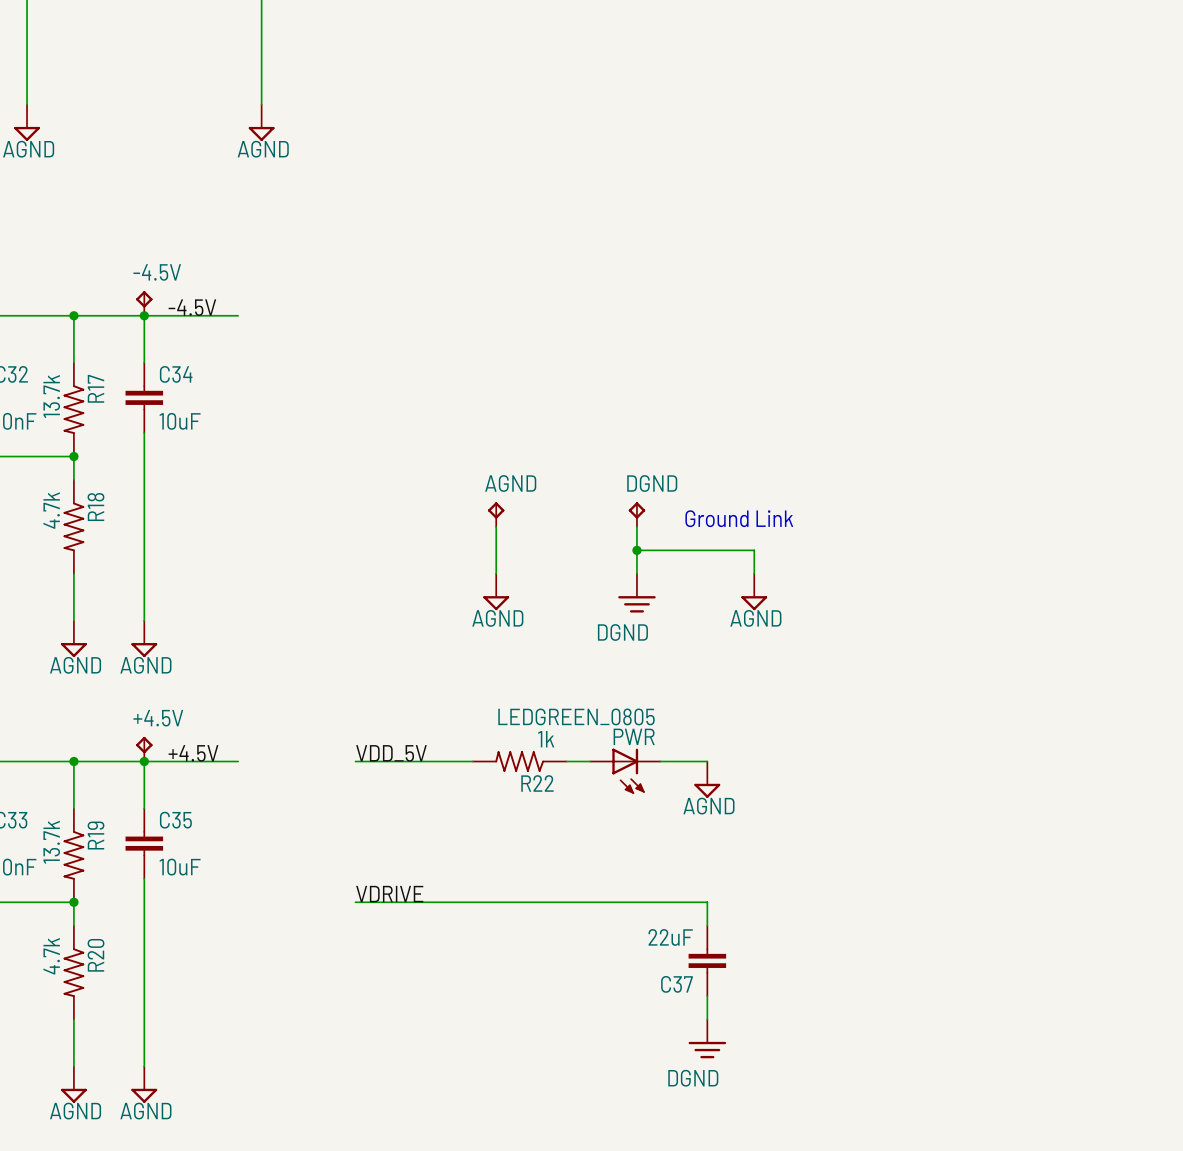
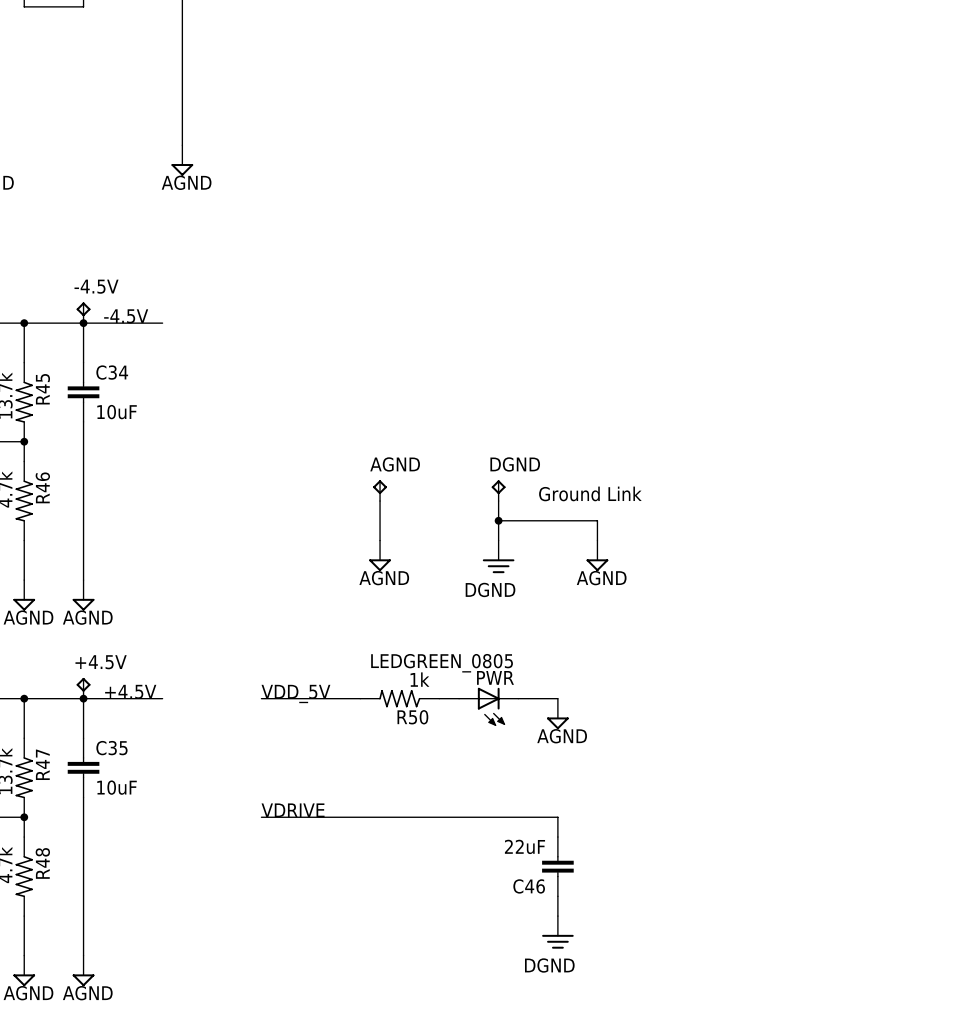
R17 name: R17 (95, 388) -> R45 (42, 389)
R18 name: R18 (95, 507) -> R46 (42, 487)
R22 name: R22 (537, 783) -> R50 (412, 717)
R19 name: R19 (95, 835) -> R47 (42, 764)
R20 name: R20 (95, 955) -> R48 (42, 863)
C37 name: C37 (676, 984) -> C46 (529, 886)

